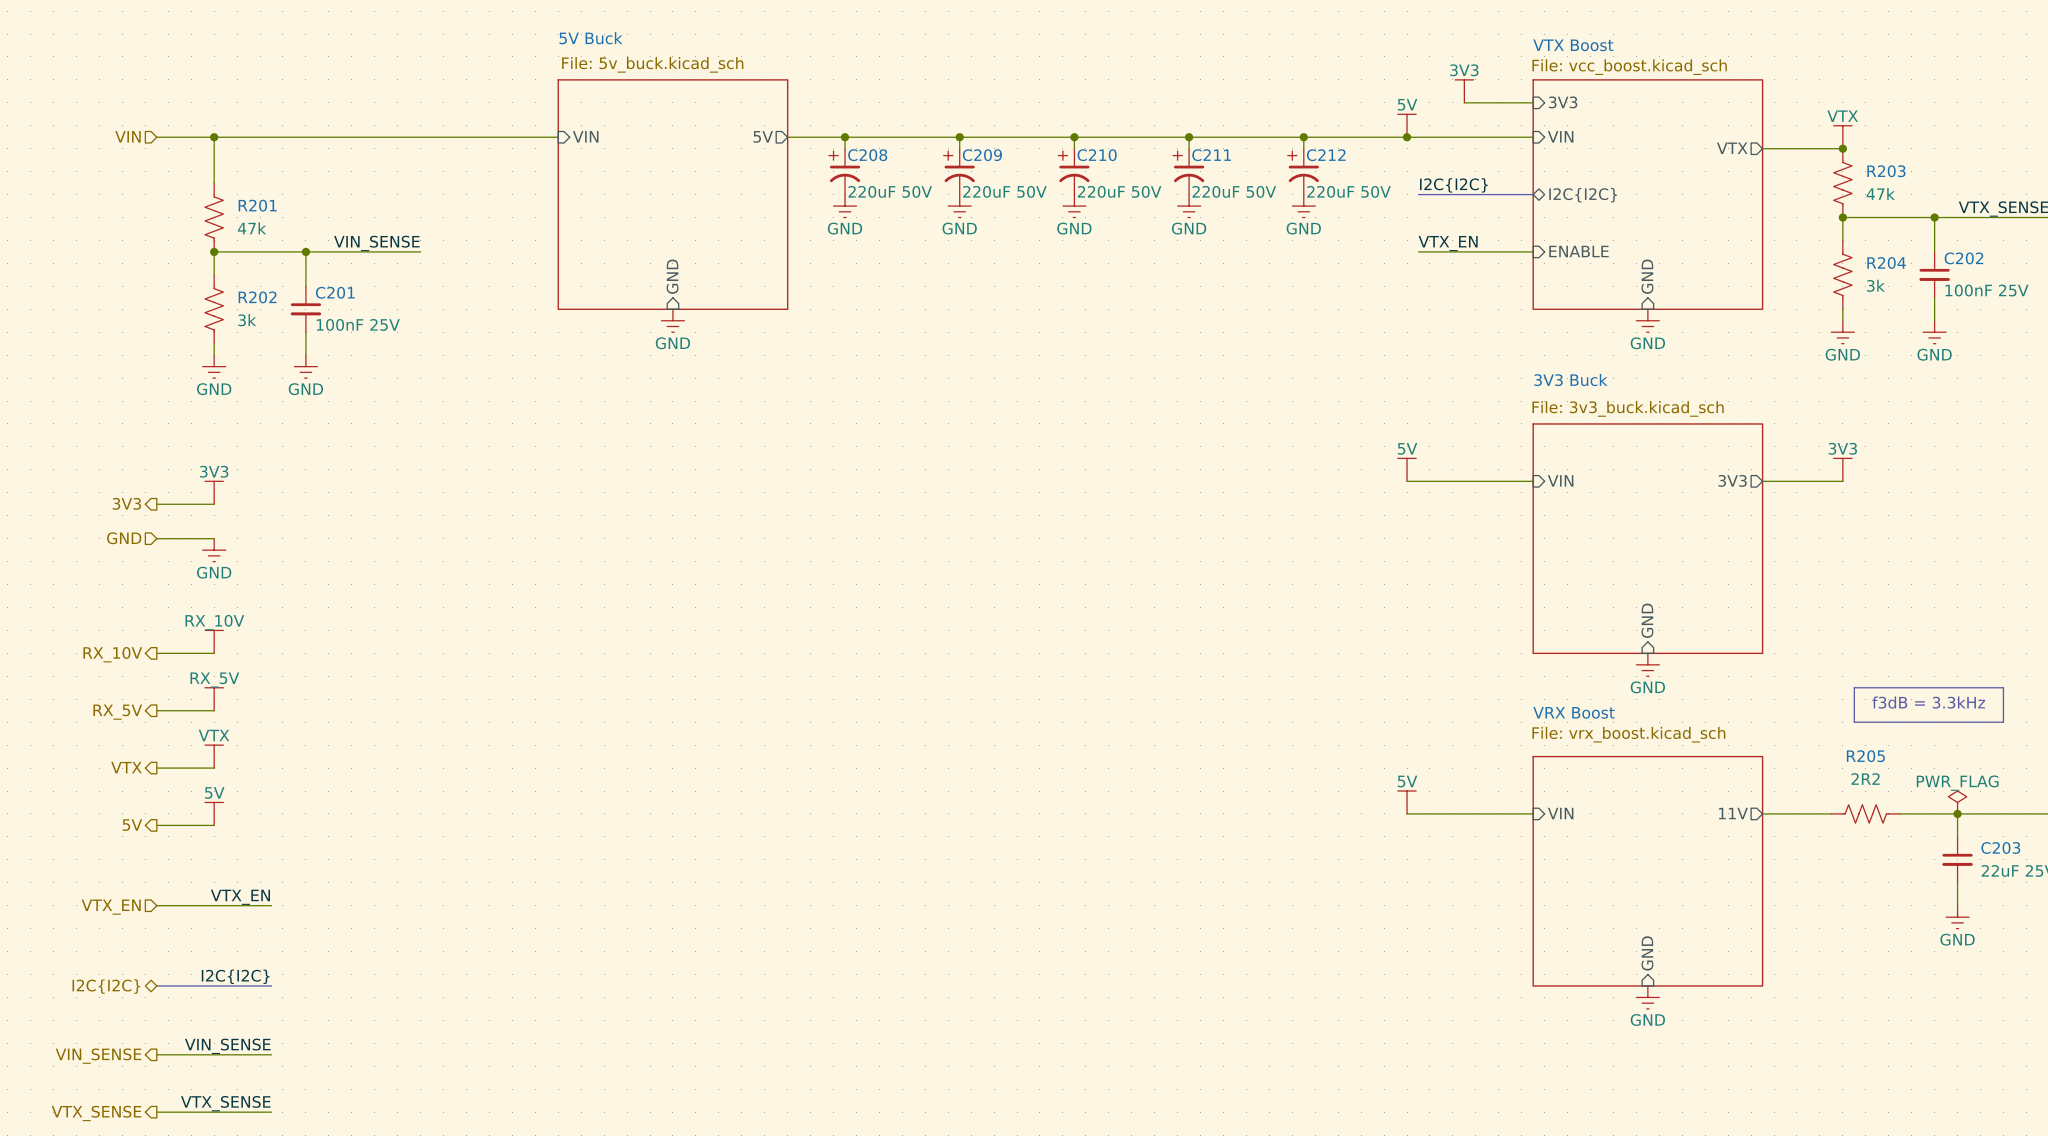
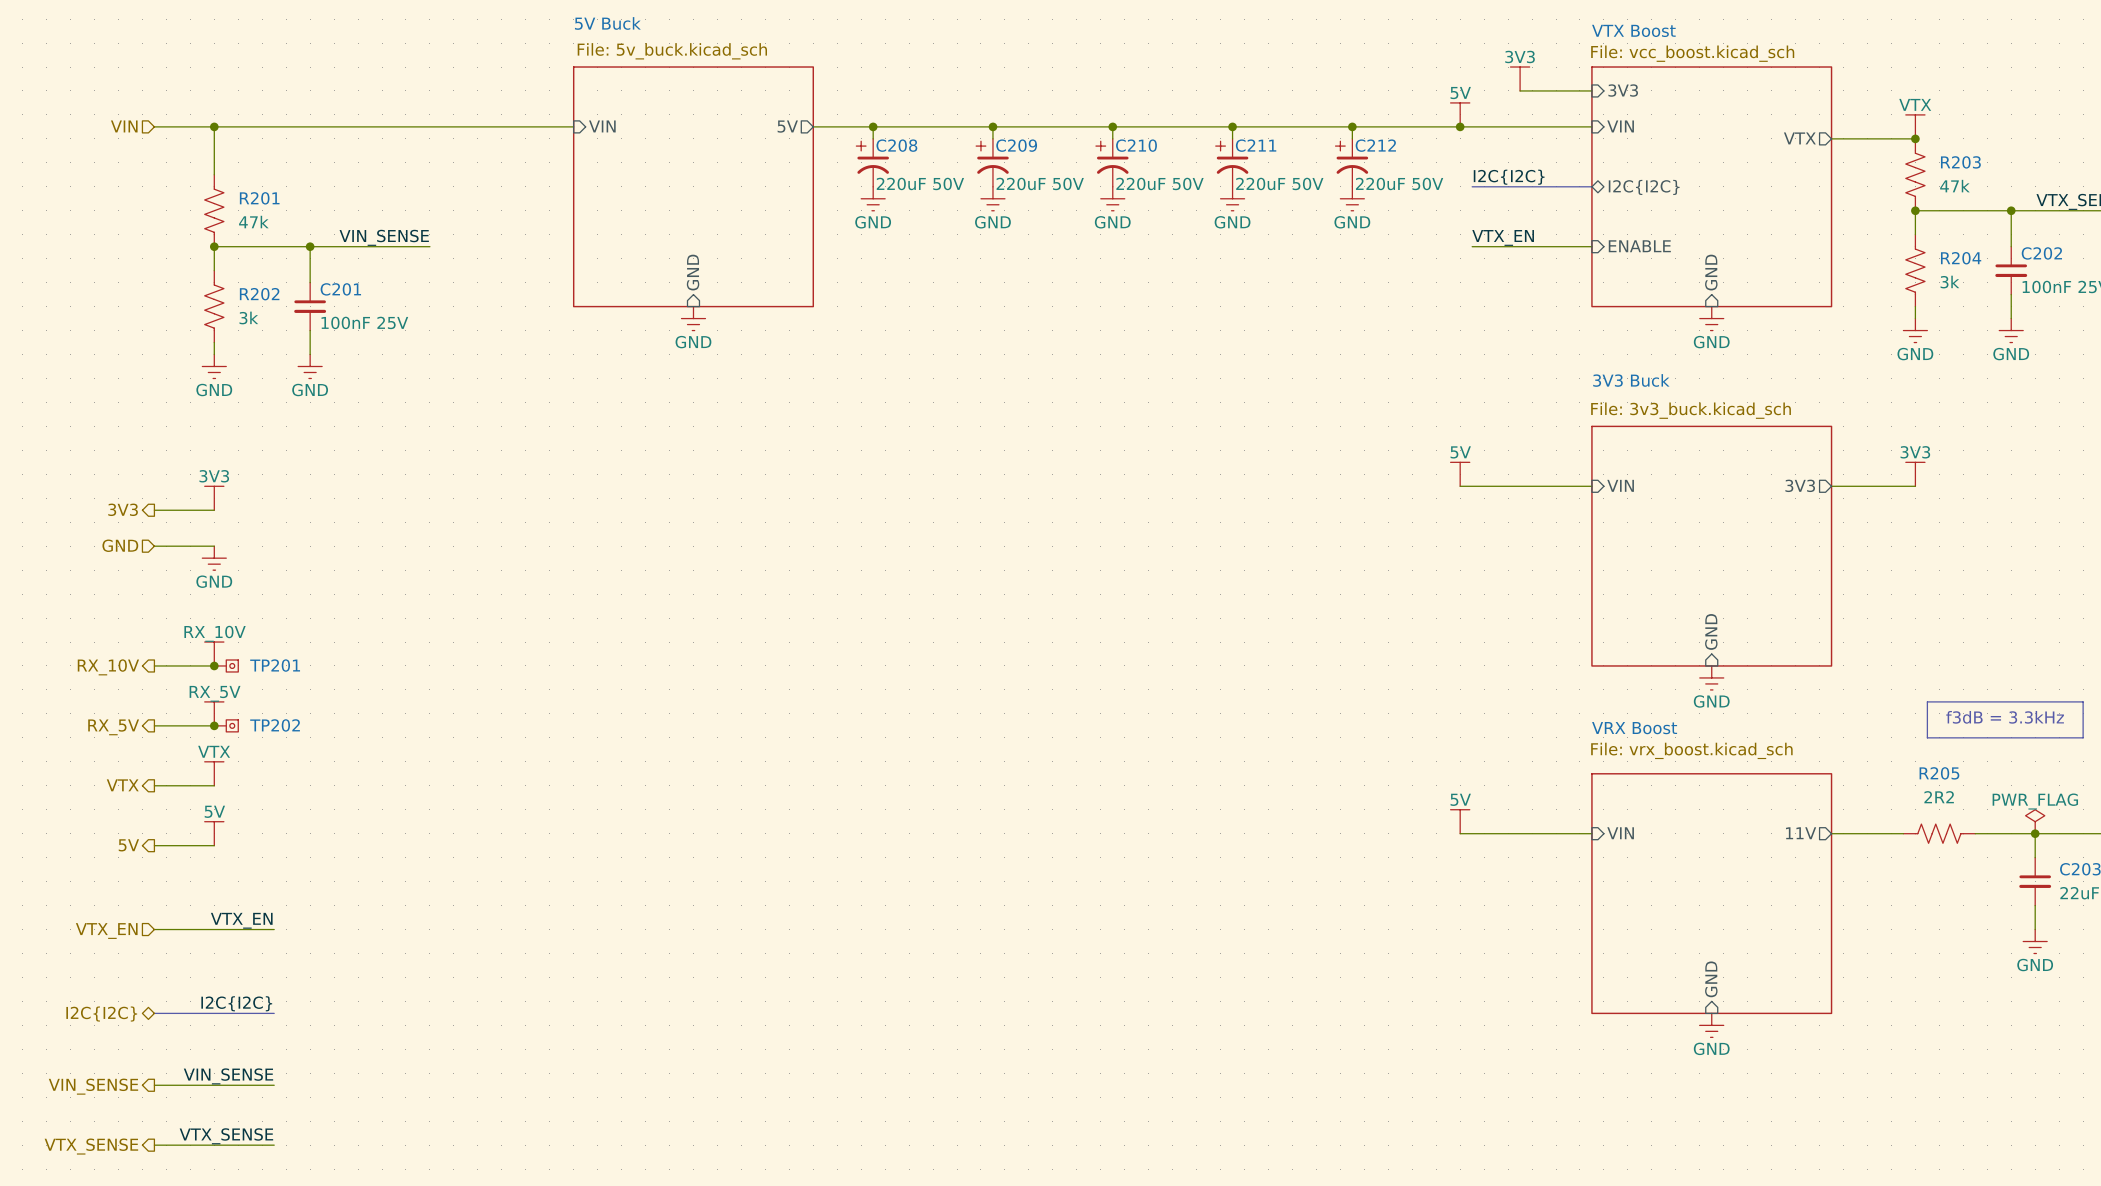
junction: none -> (214, 665)
TP201: none -> (226, 665)
junction: none -> (214, 725)
TP202: none -> (226, 725)

